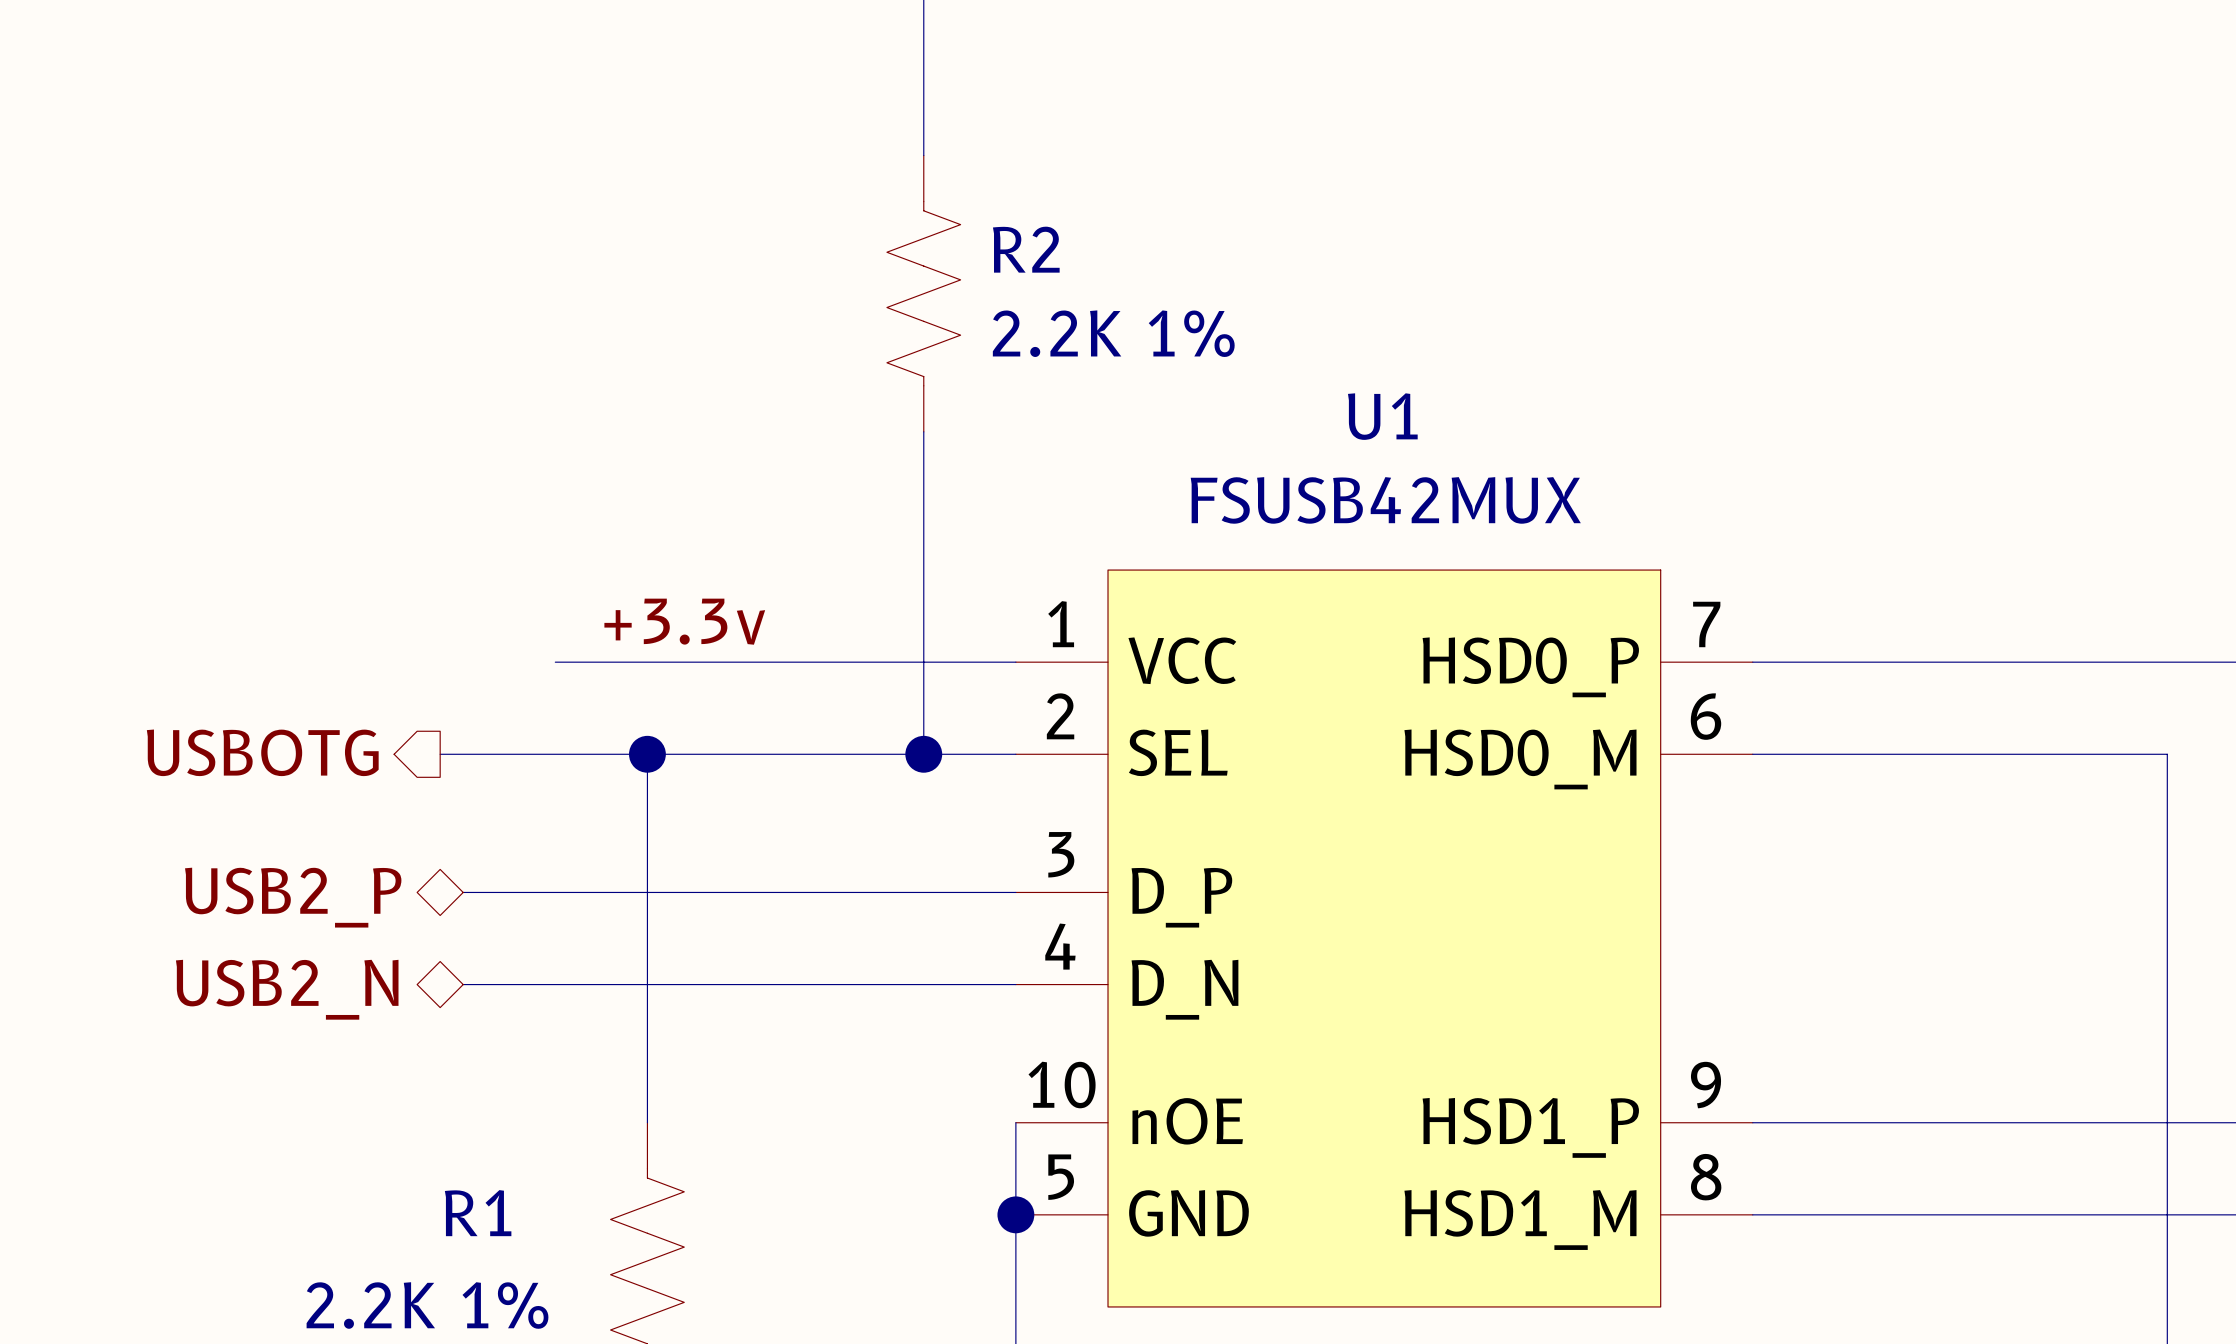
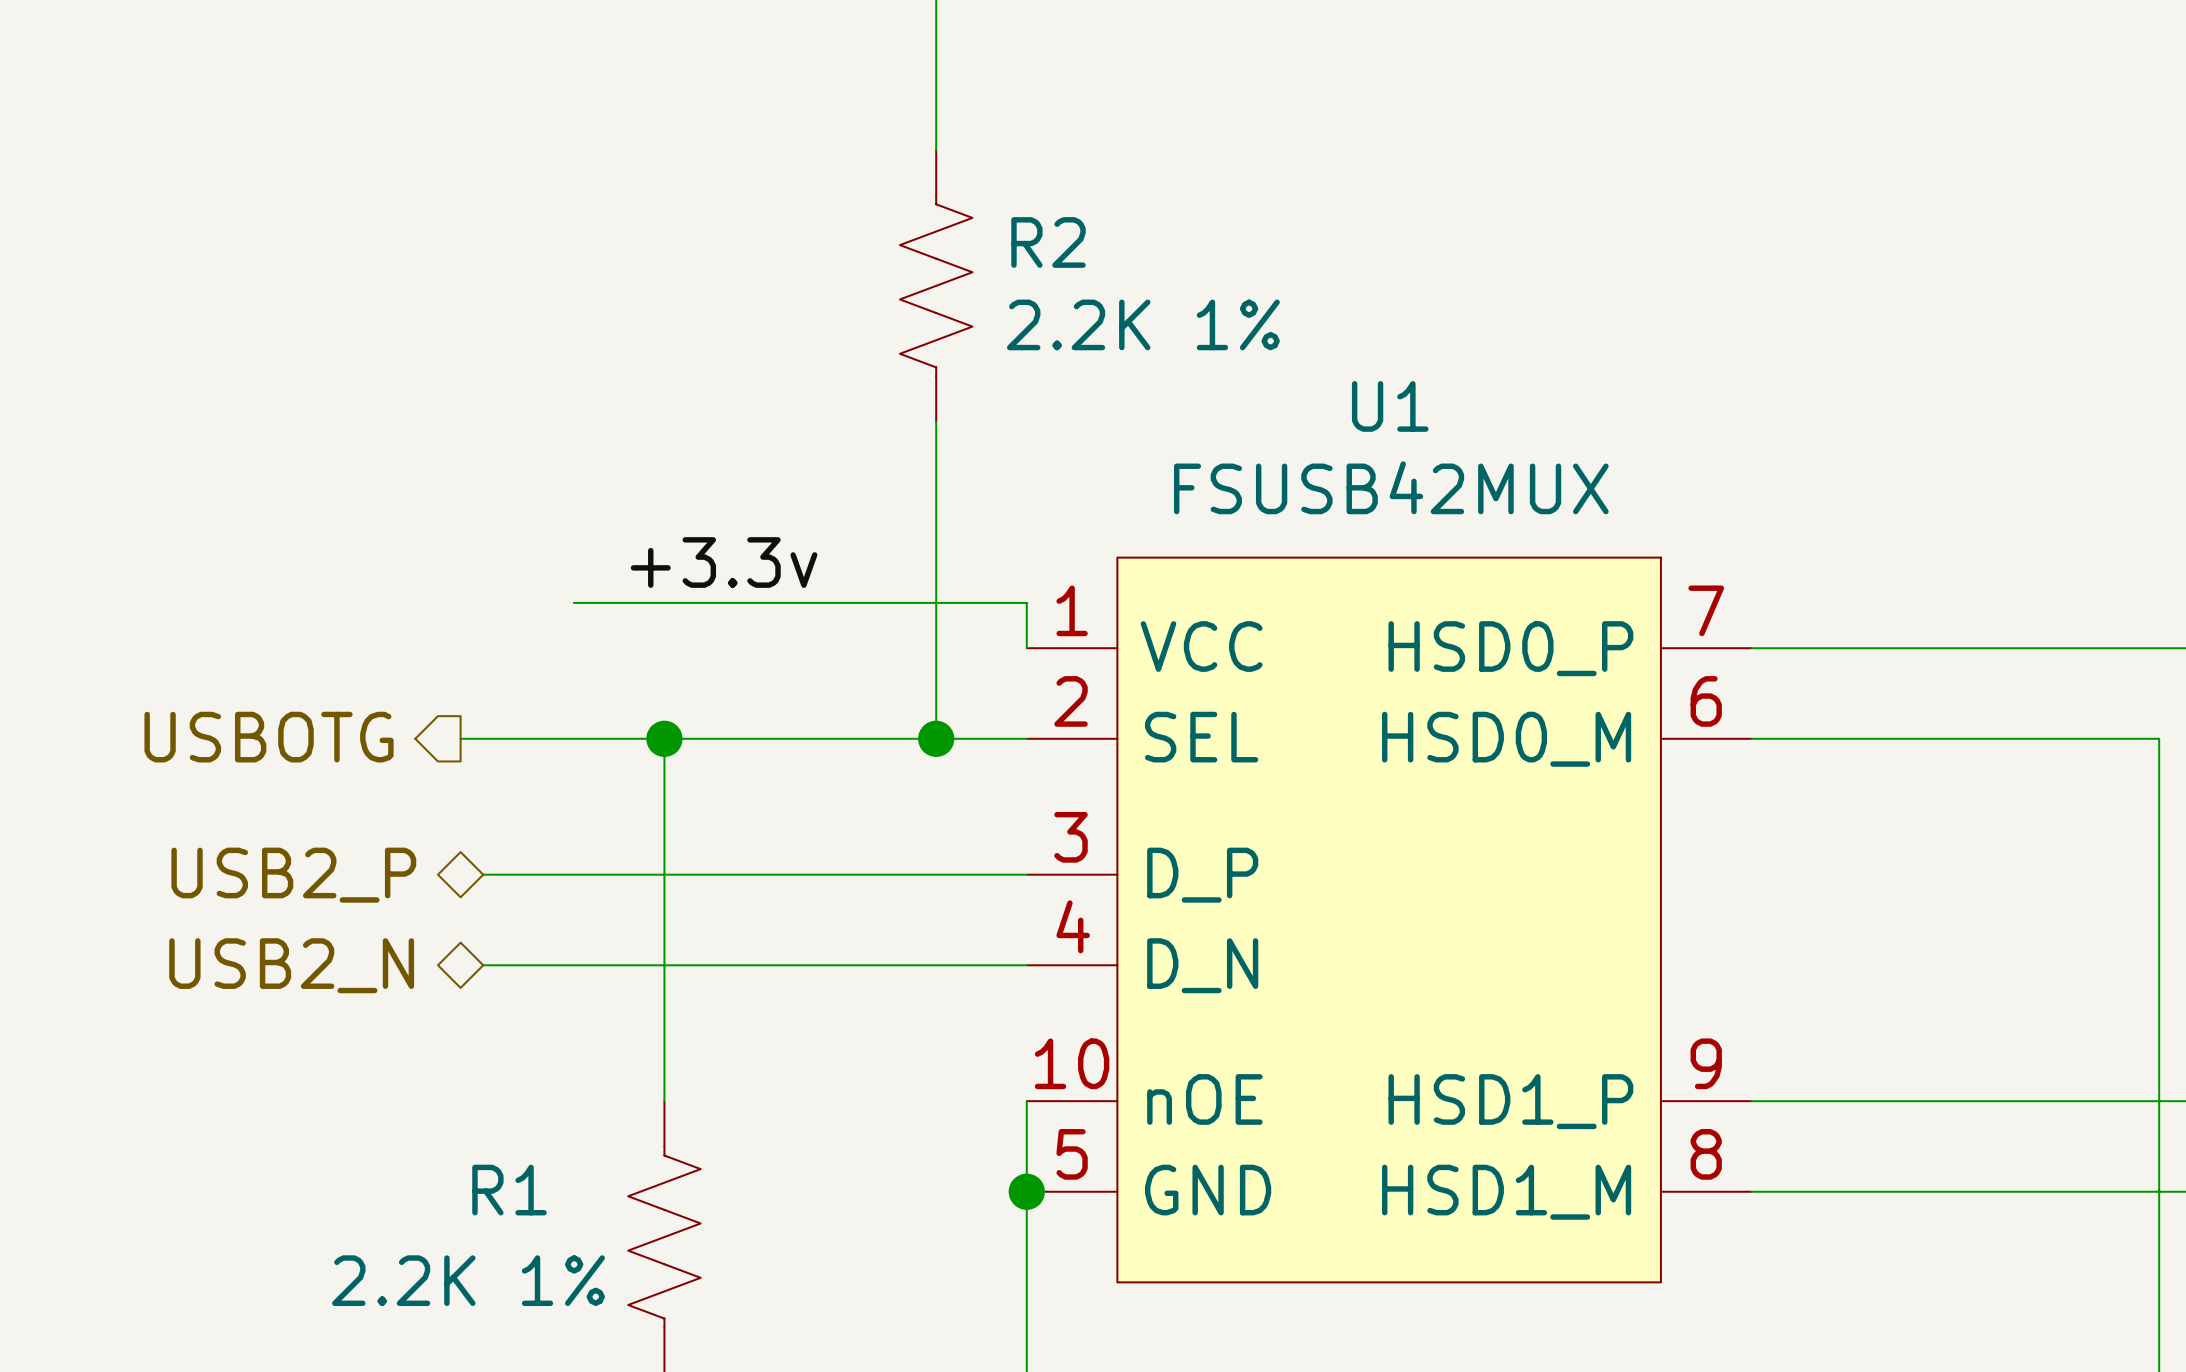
label position: +3.3v (684, 621) -> +3.3v (724, 562)
wire: (555, 662) (1015, 662) -> (573, 602) (1026, 602) (1026, 648)

